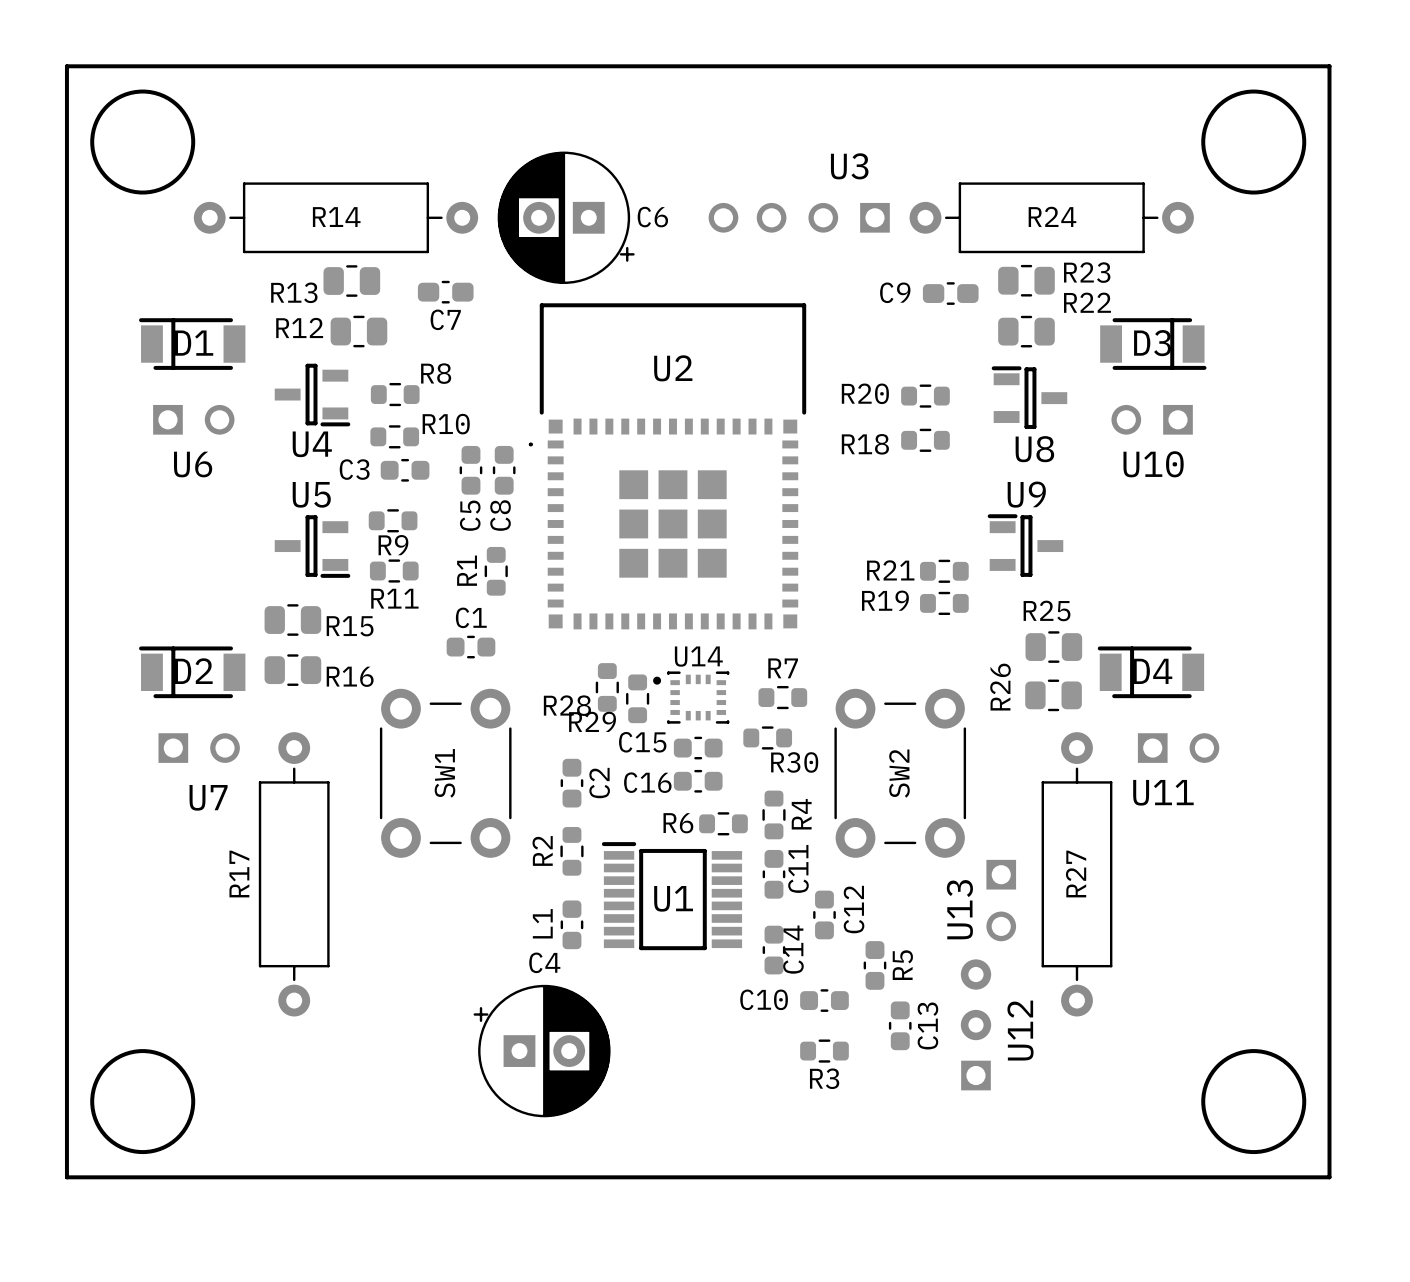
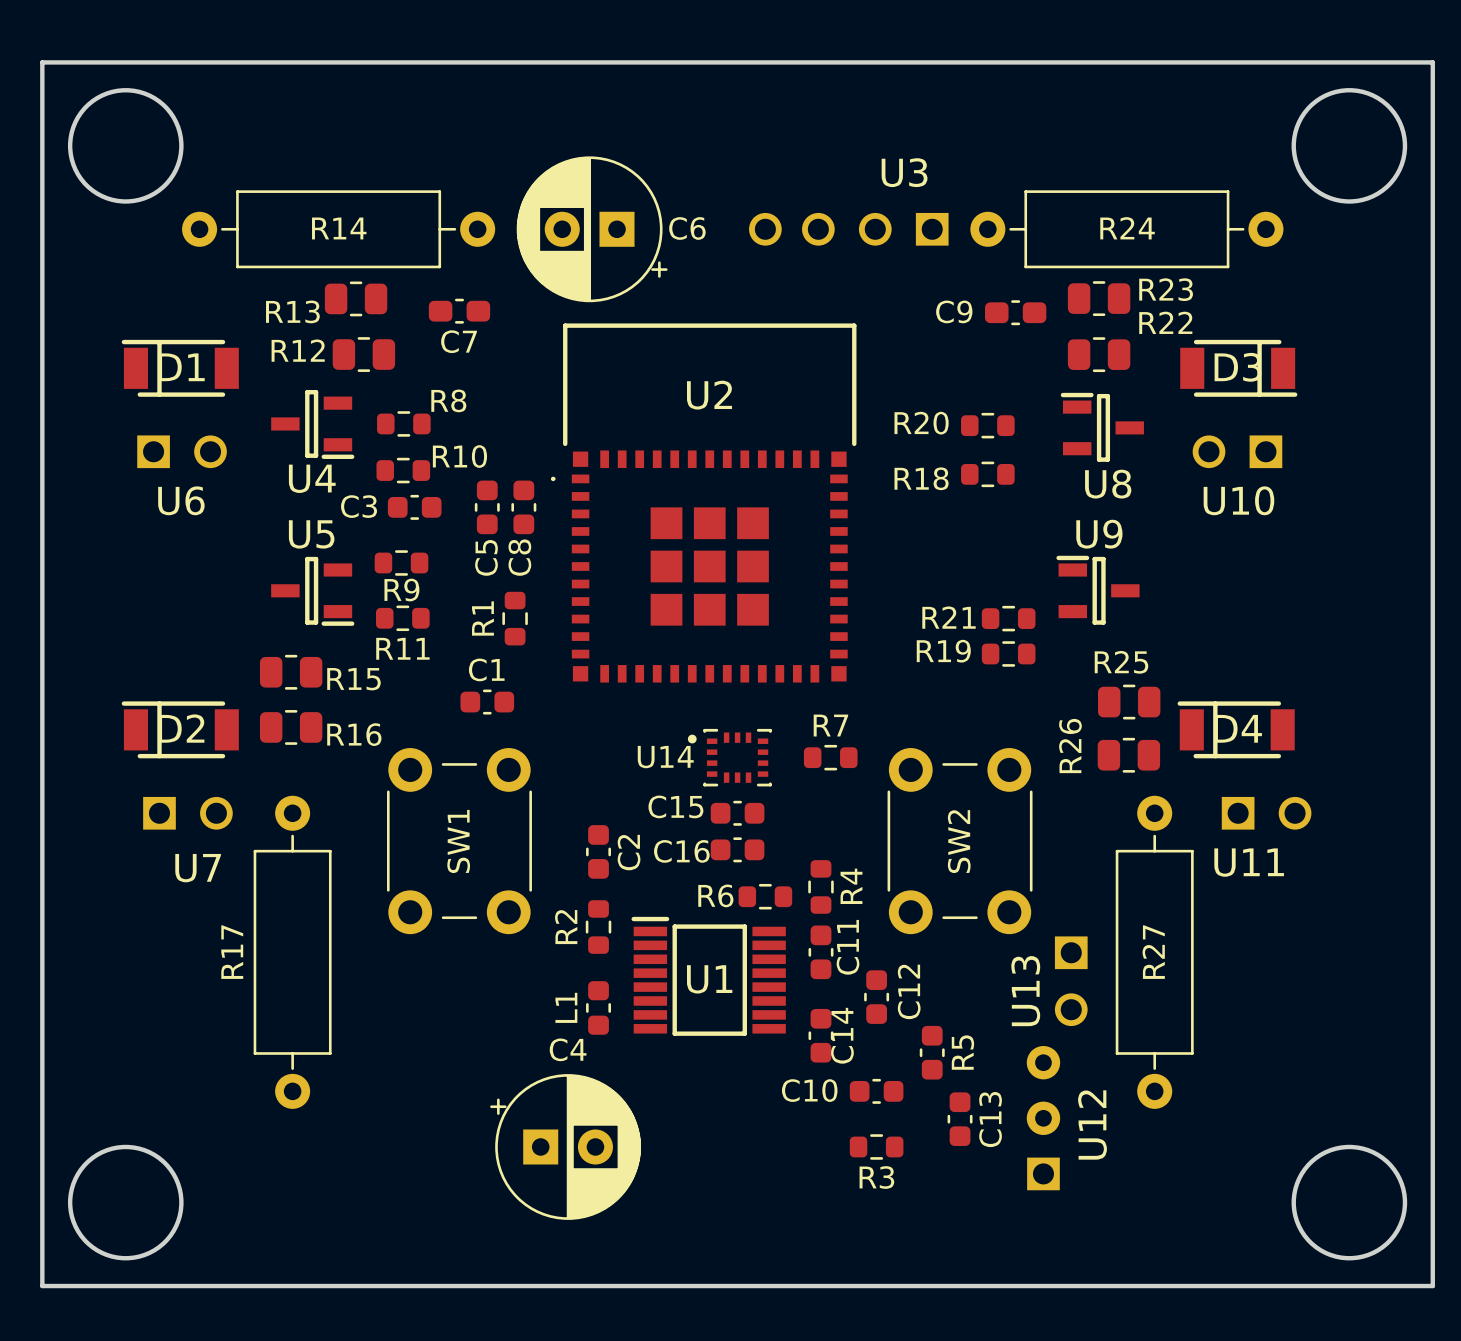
U14 name position: U14 (698, 656) -> U14 (665, 757)
R28: (607, 687) -> none
R29: (637, 698) -> none
R30: (767, 737) -> none

